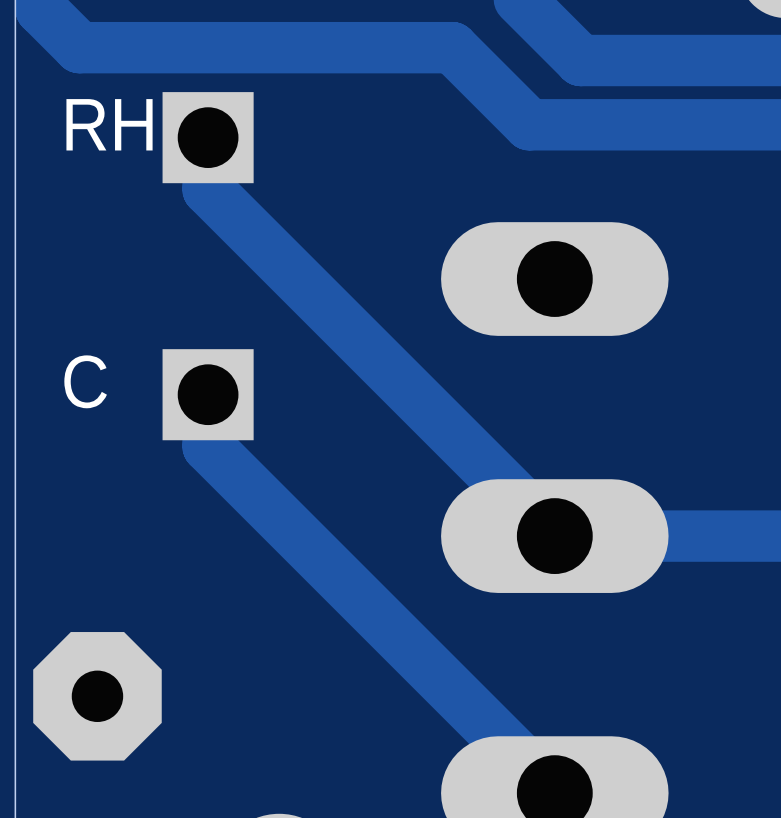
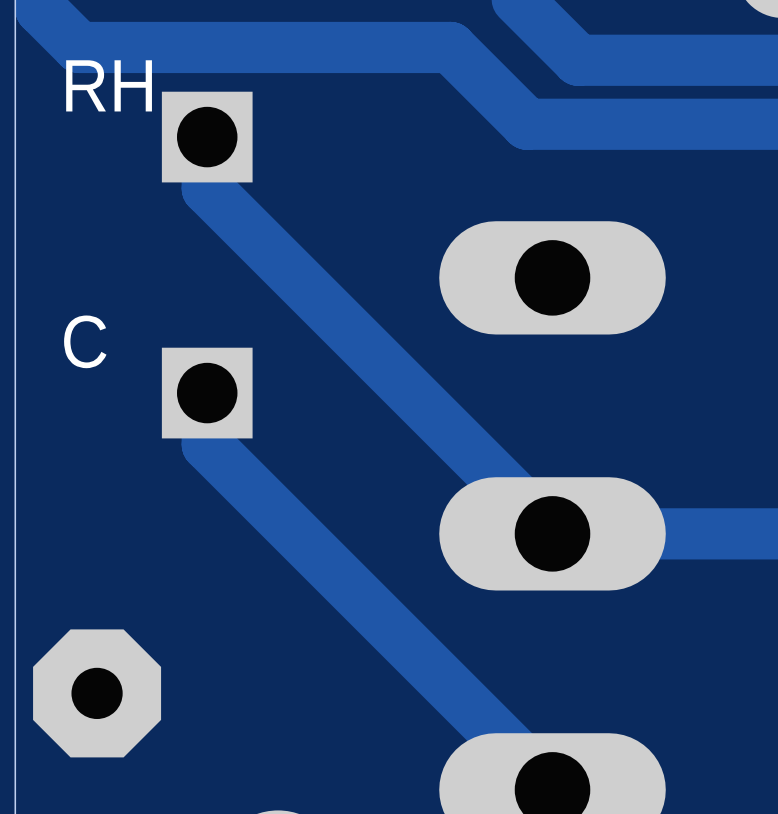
text position: RH (109, 124) -> RH (109, 85)
text position: C (85, 381) -> C (85, 341)

